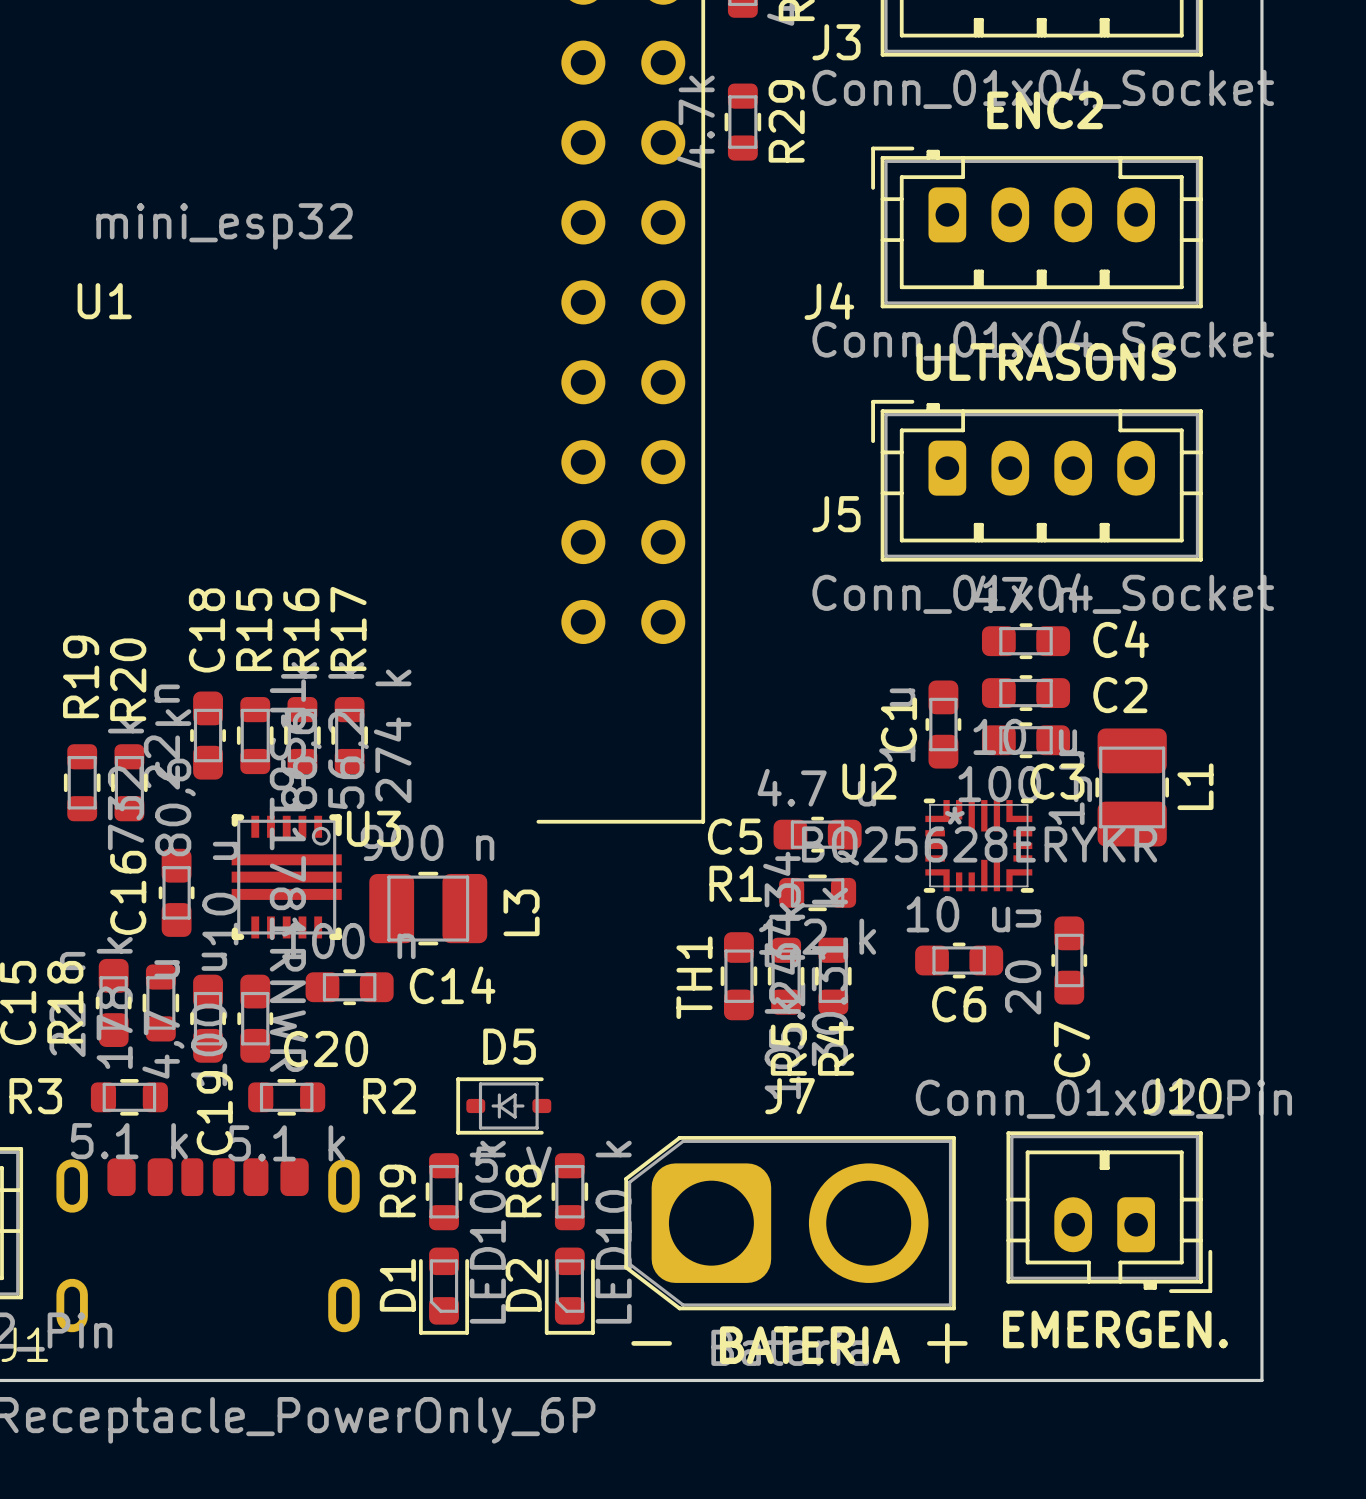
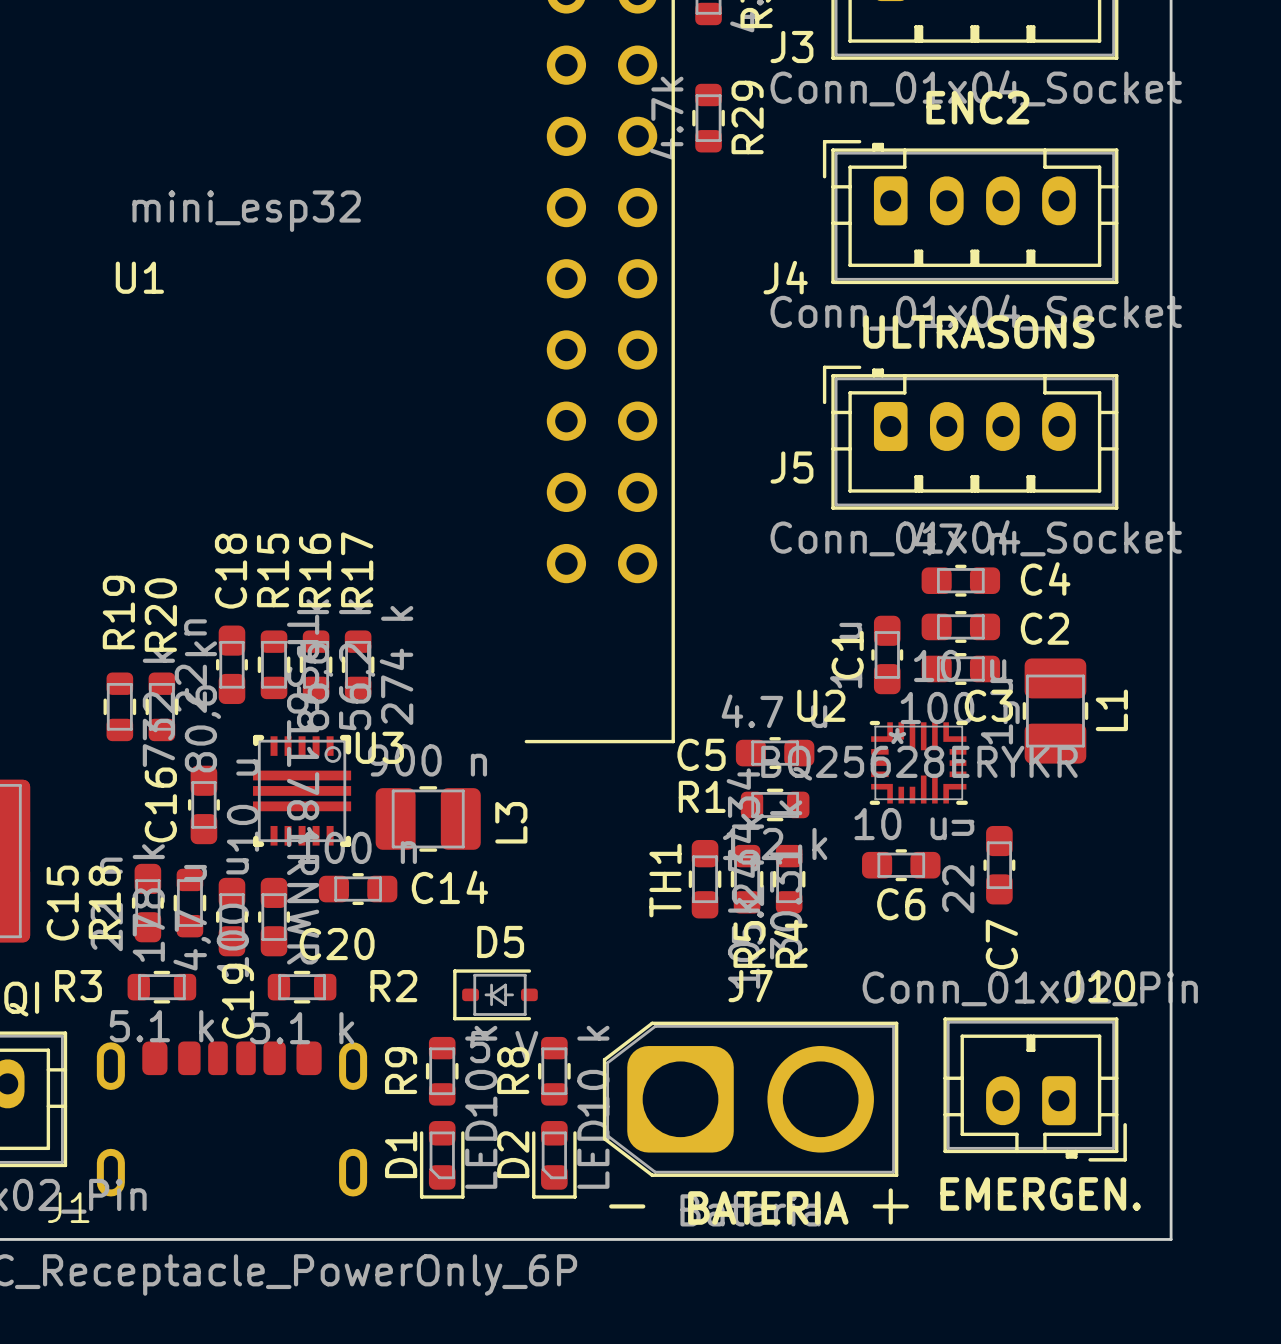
C7 value: 20 u (1023, 961) -> 22 u (958, 866)

